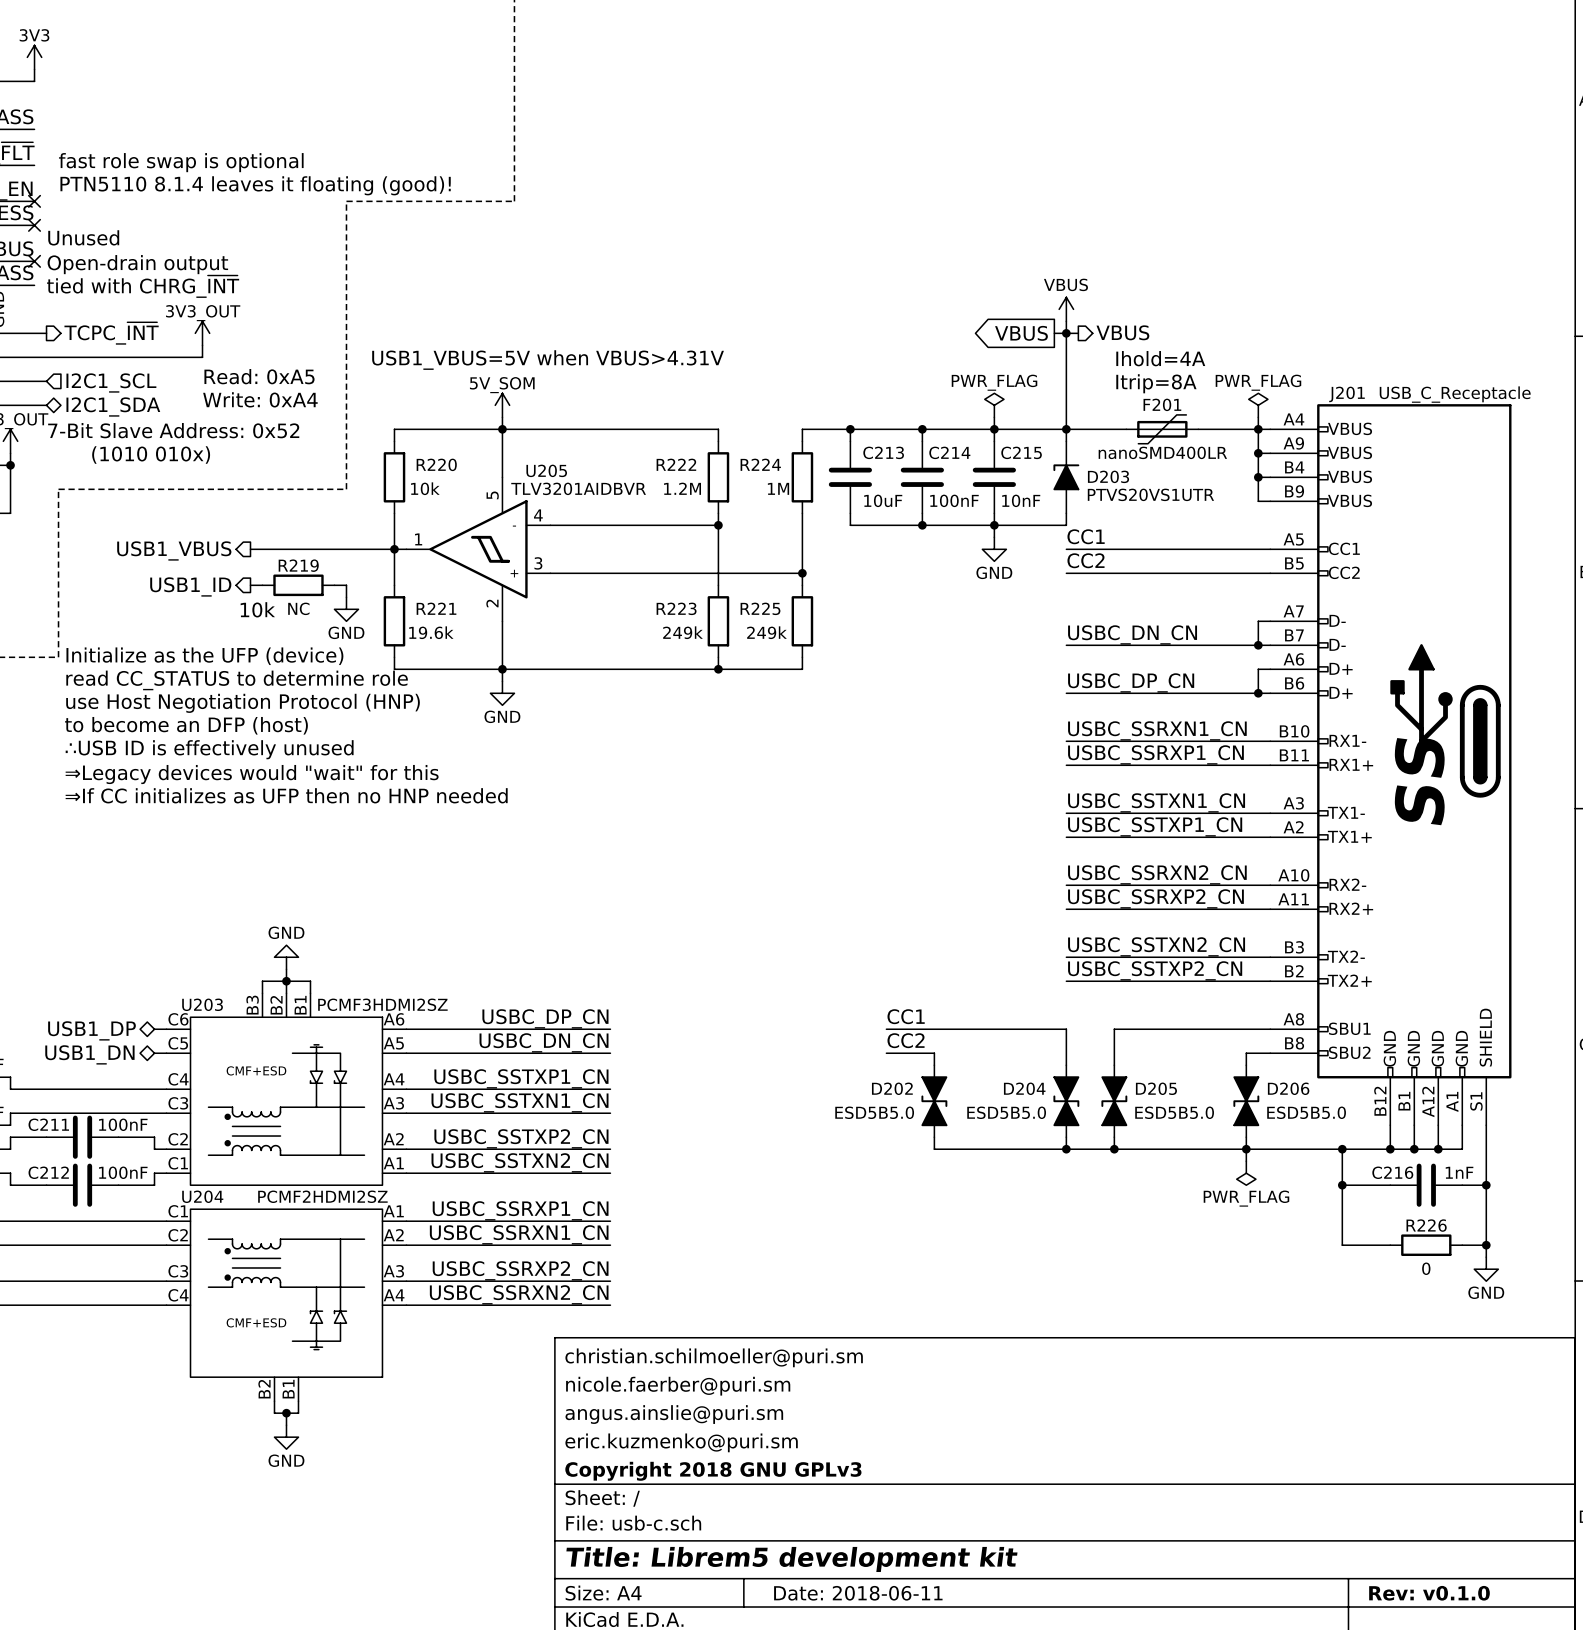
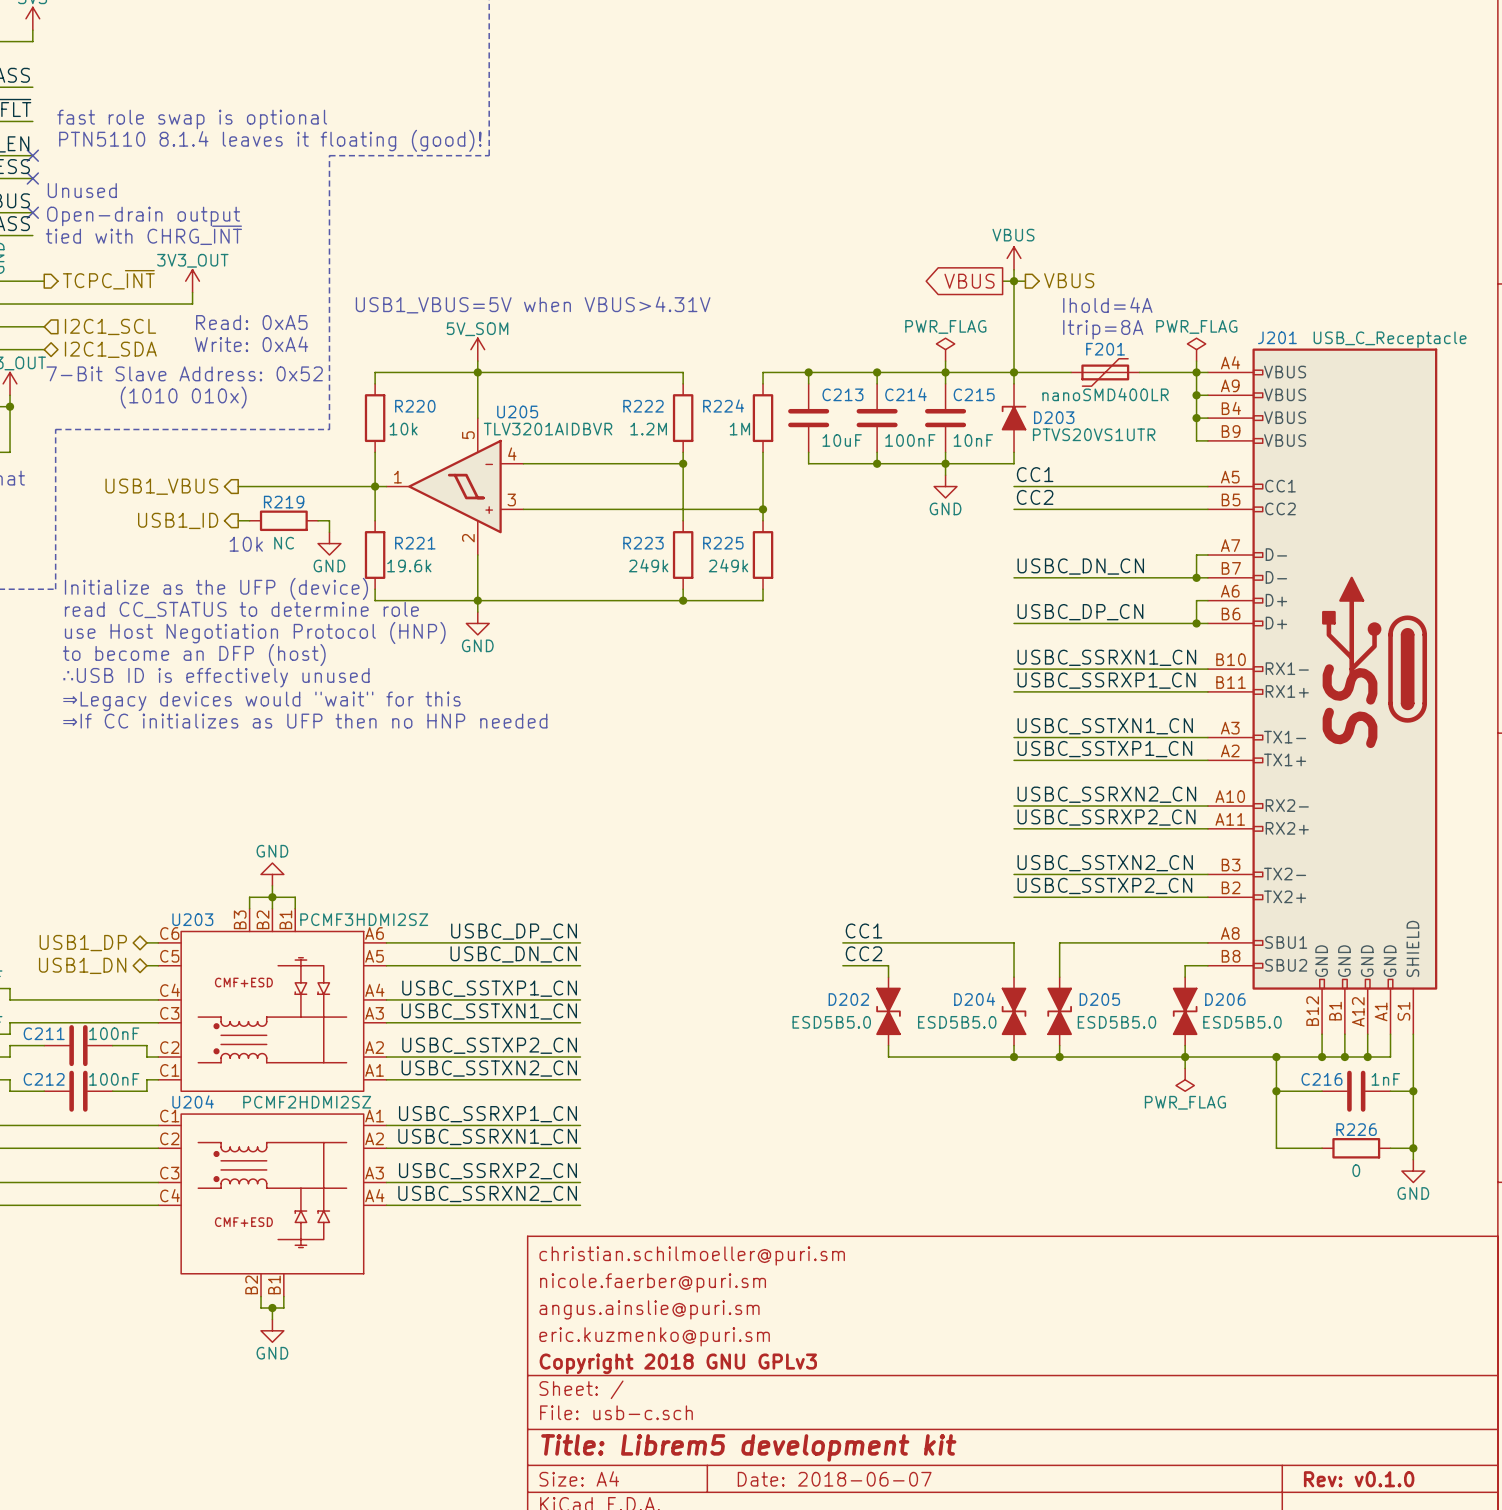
title block: Date: 2018-06-11 (858, 1593) -> Date: 2018-06-07 (834, 1479)

